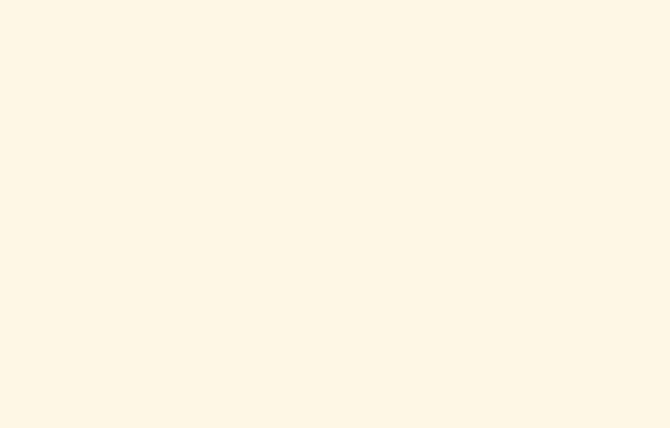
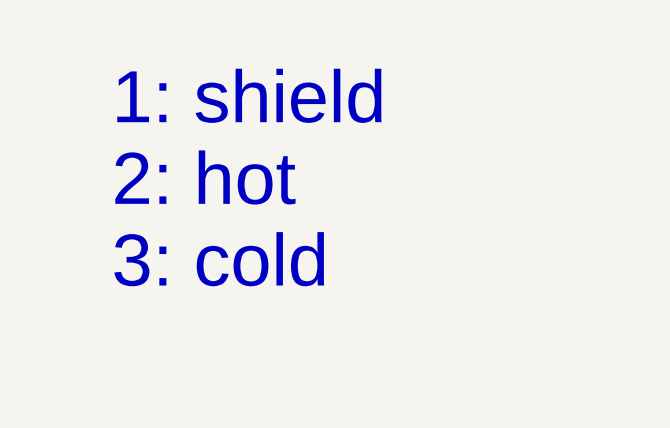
text: none -> 1: shield (249, 95)
text: none -> 2: hot (205, 177)
text: none -> 3: cold (219, 259)

